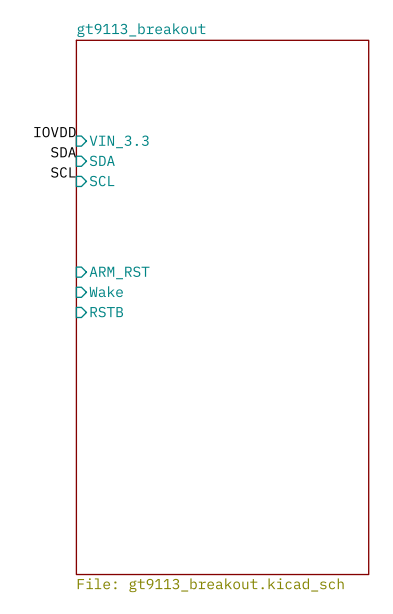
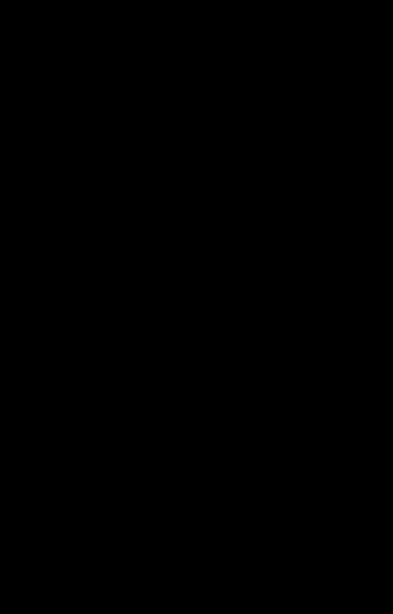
label: IOVDD (54, 132) -> none
sheet pin: VIN_3.3 (119, 141) -> none
label: SDA (63, 152) -> none
sheet pin: SDA (102, 160) -> none
label: SCL (63, 172) -> none
sheet pin: SCL (102, 181) -> none
sheet pin: ARM_RST (119, 272) -> none
sheet pin: Wake (106, 291) -> none
sheet gt9113_breakout: File: gt9113_breakout.kicad_sch (222, 307) -> none
sheet pin: RSTB (106, 312) -> none

